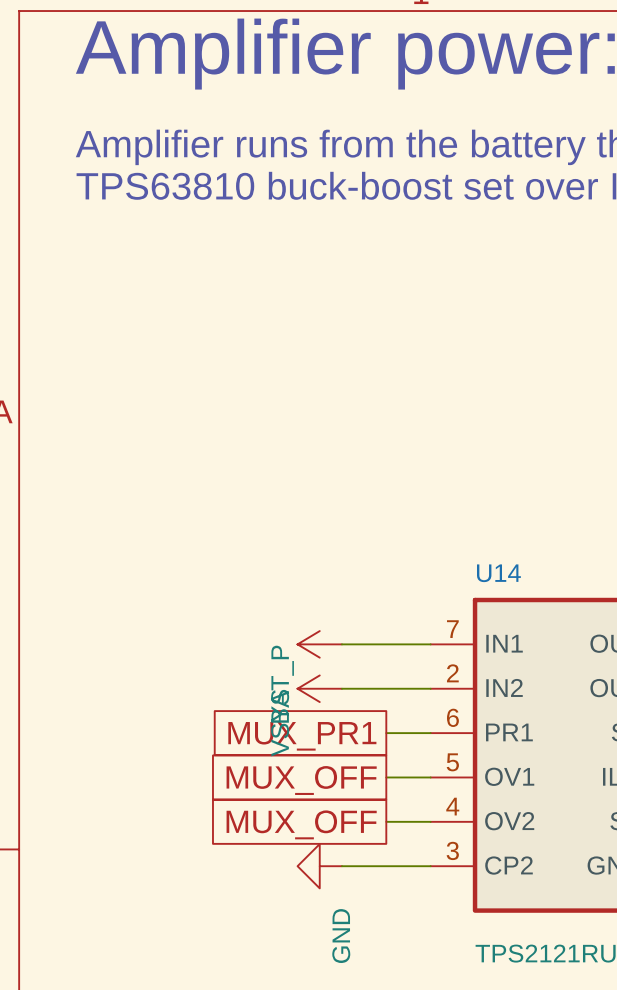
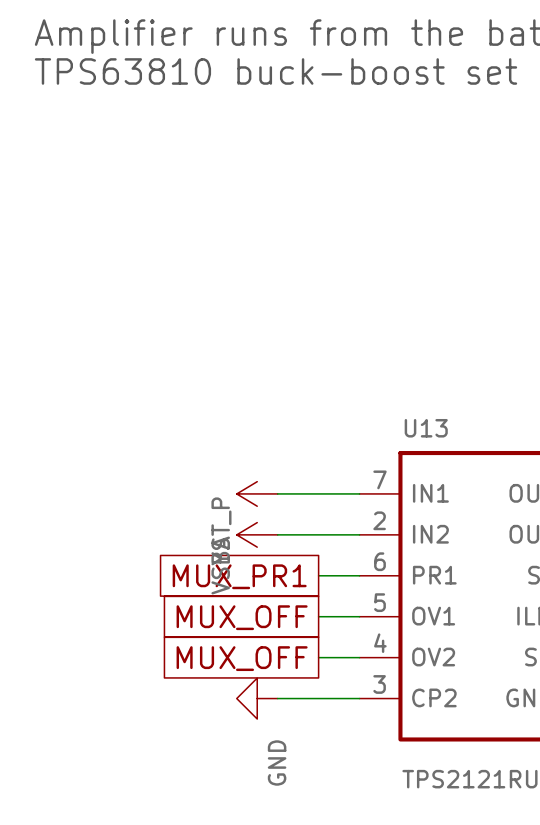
U14 name: U14 (498, 573) -> U13 (426, 428)

